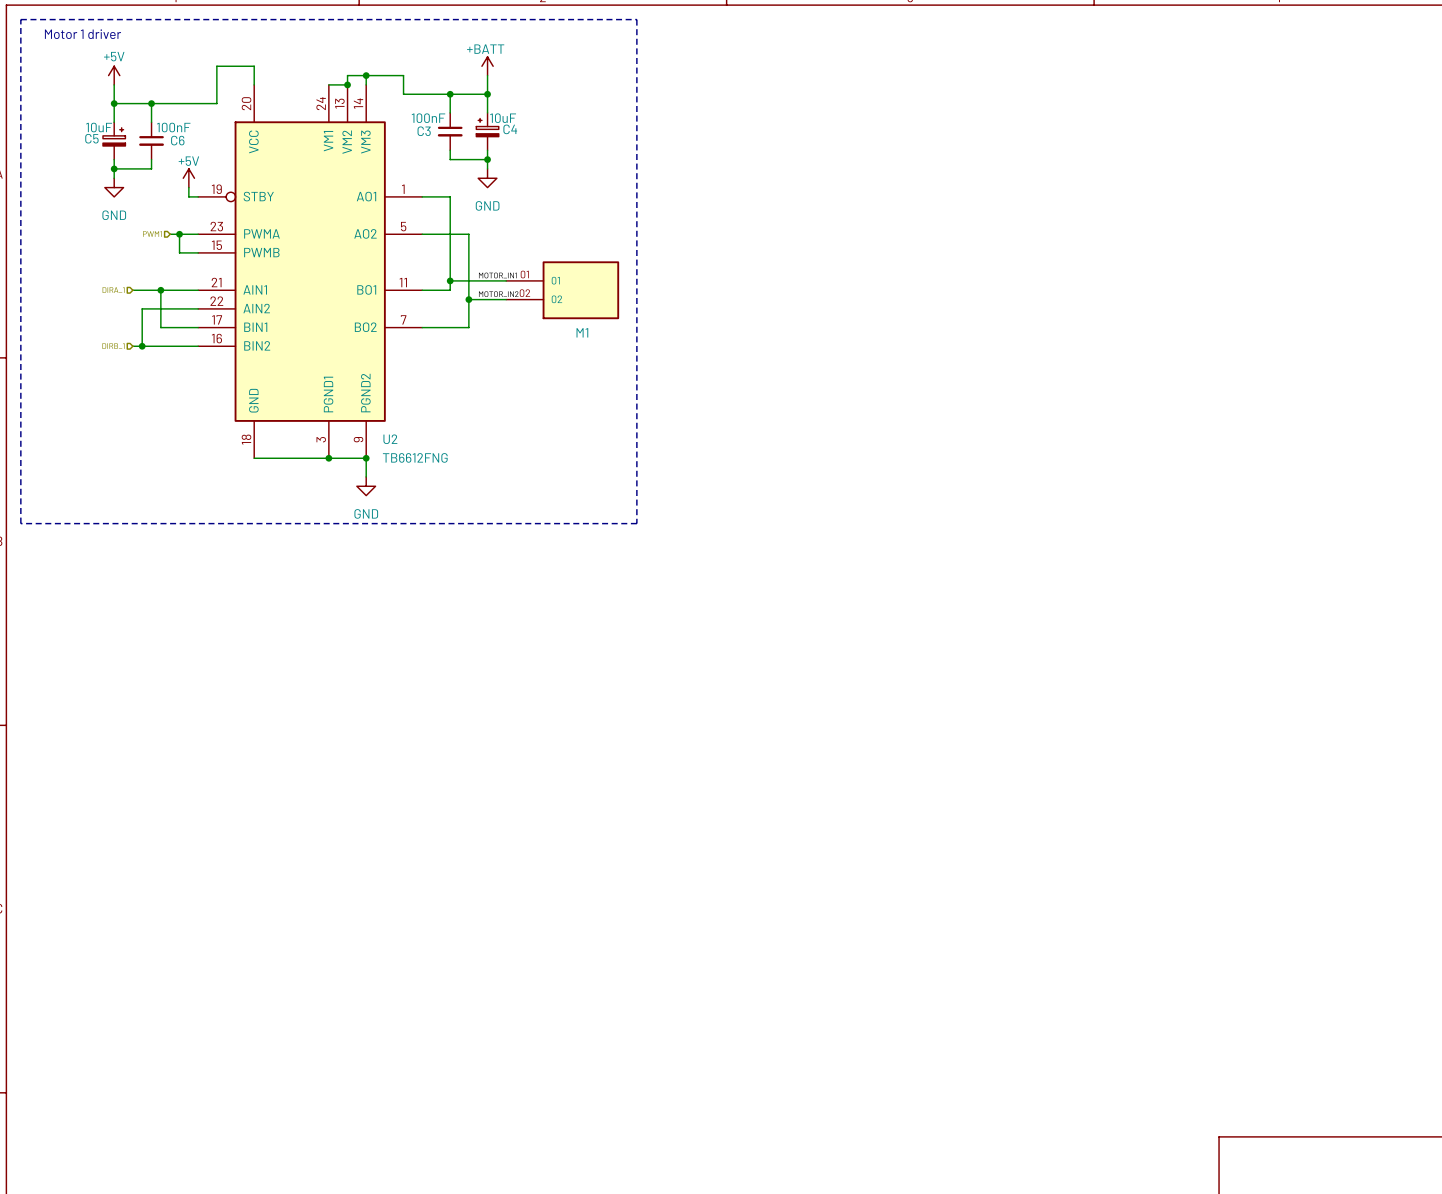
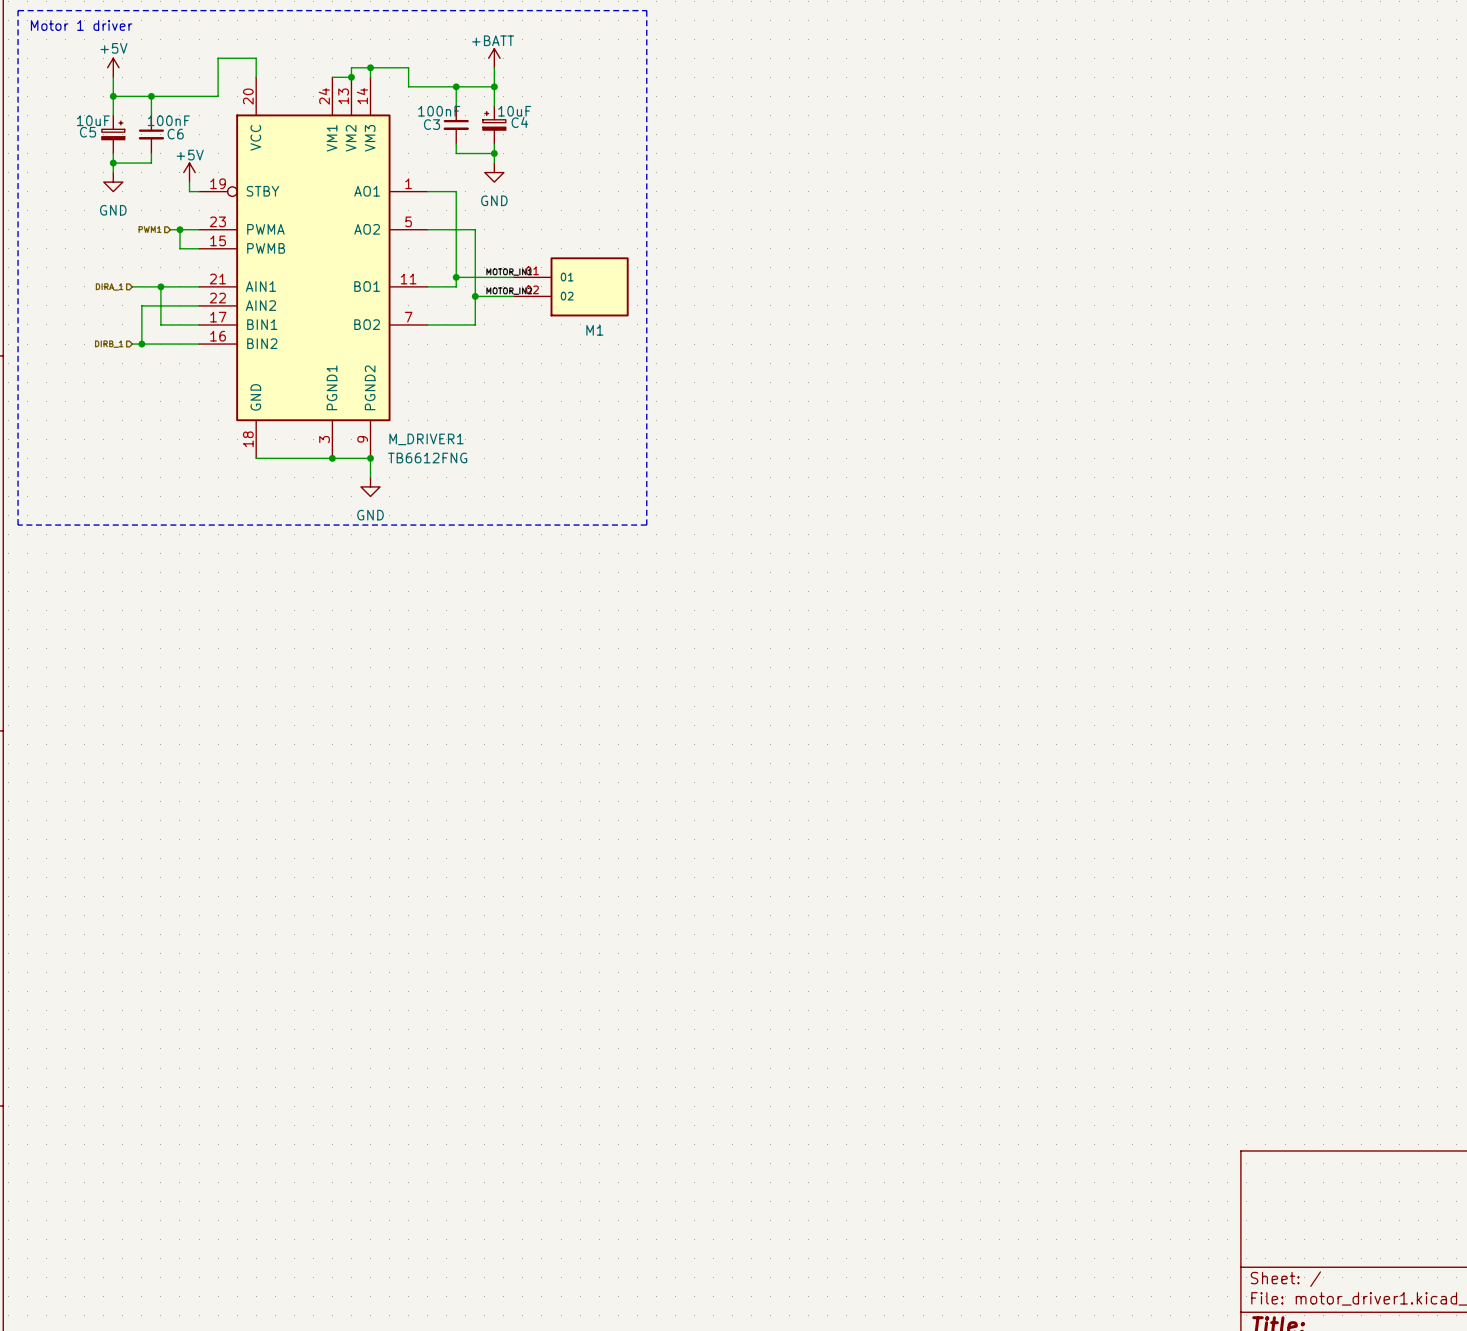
U2 name: U2 (390, 439) -> M_DRIVER1 (426, 439)

